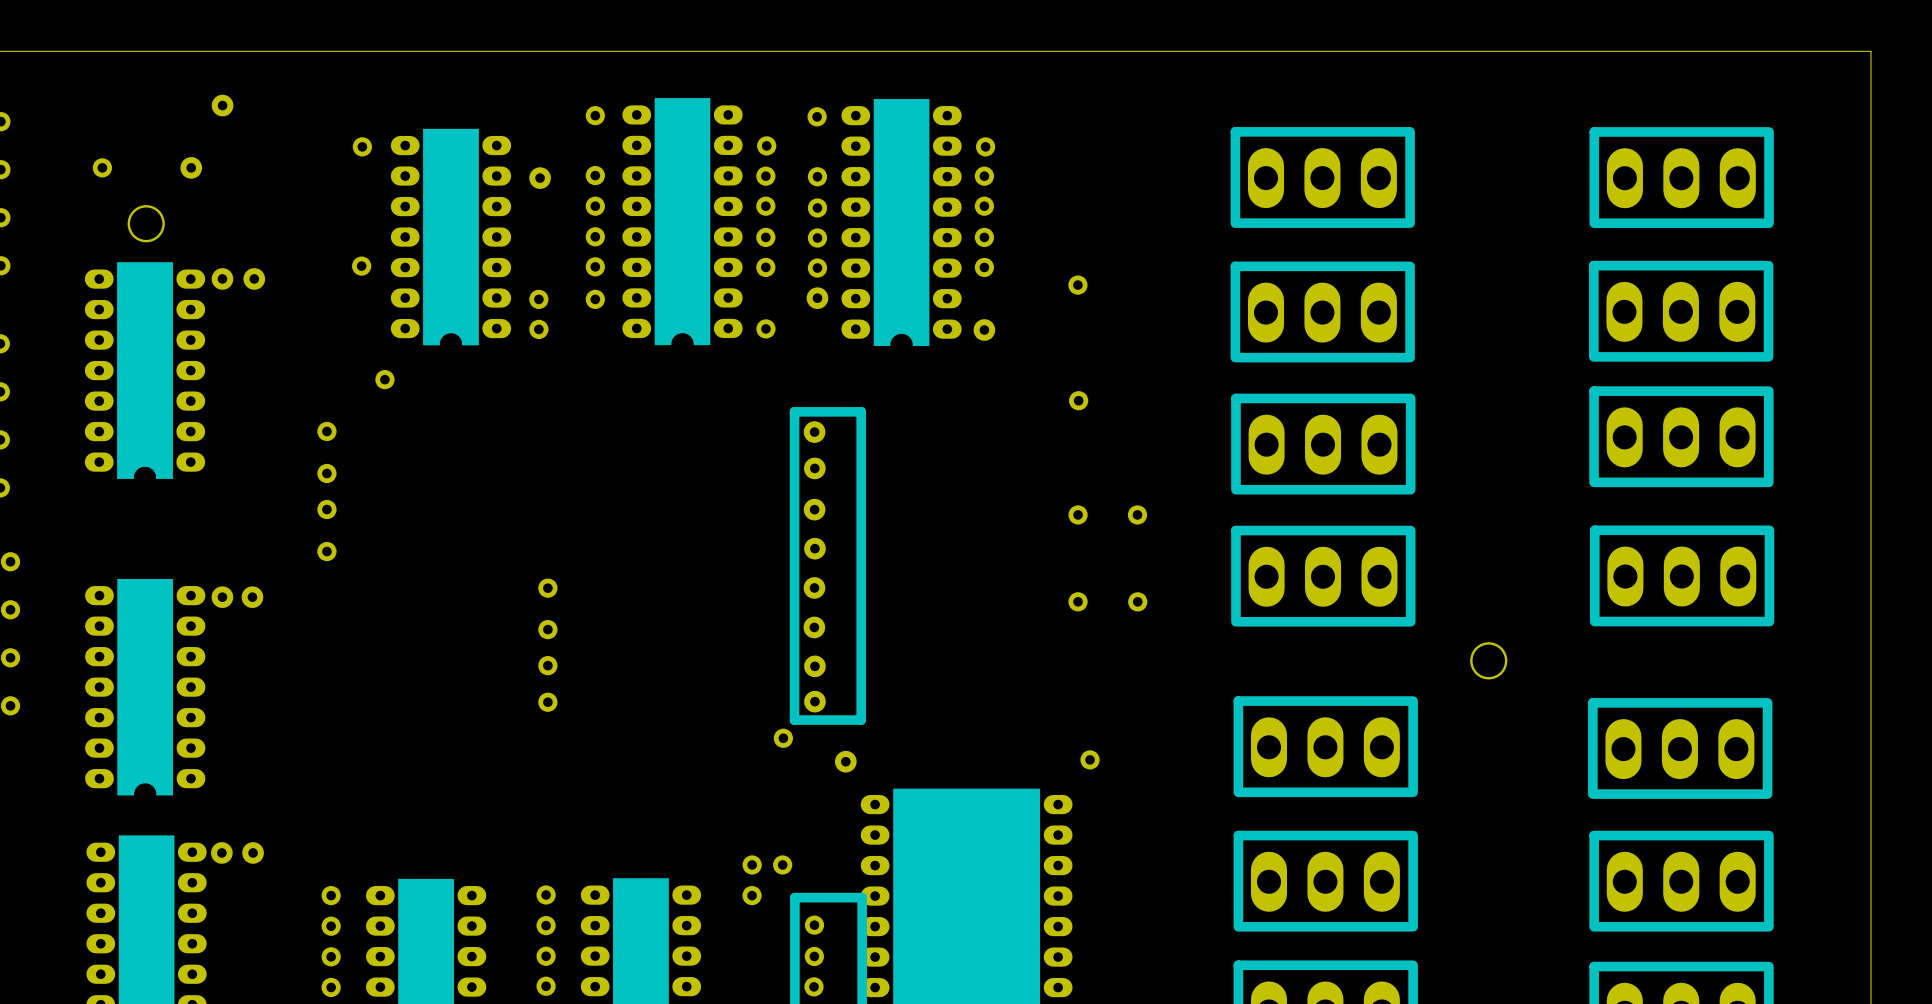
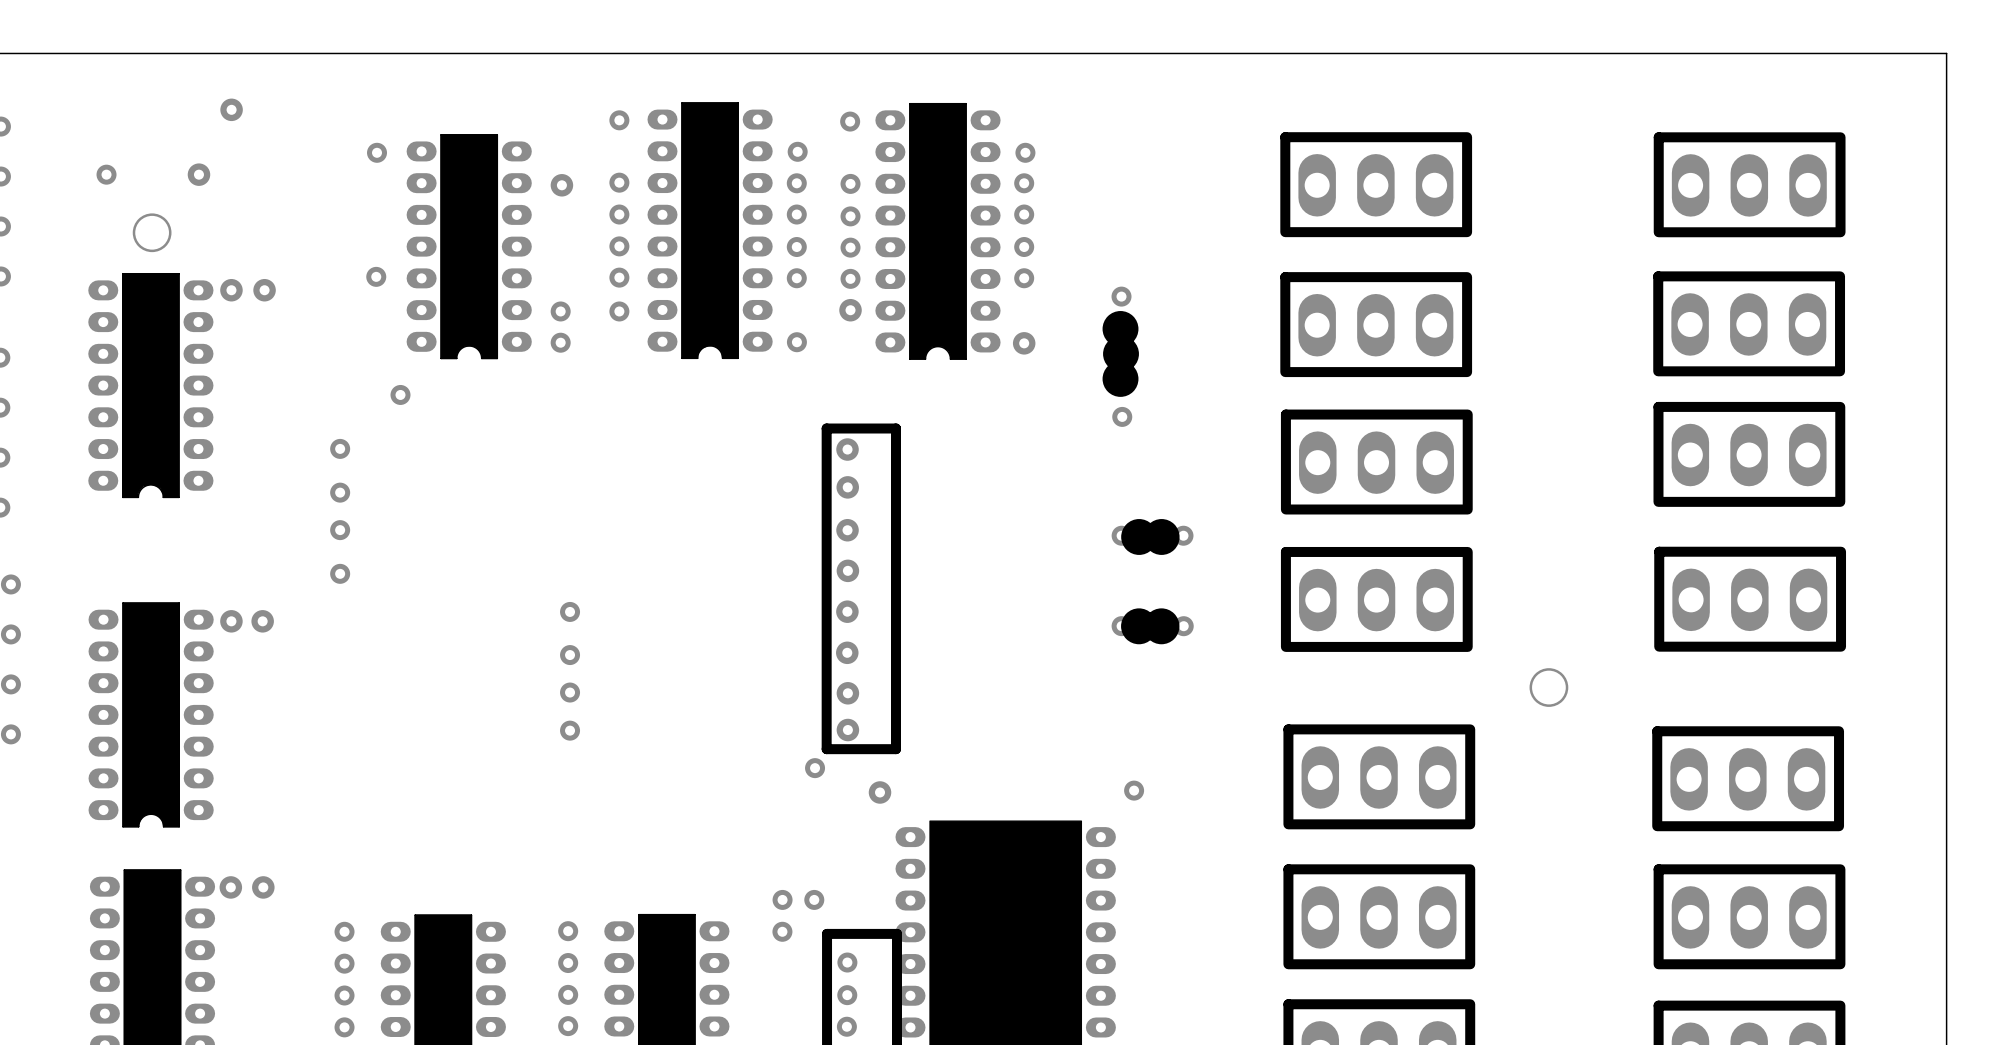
drawing: none -> [1102, 311, 1139, 397]
drawing: none -> [1121, 519, 1180, 555]
drawing: none -> [1121, 608, 1180, 645]

